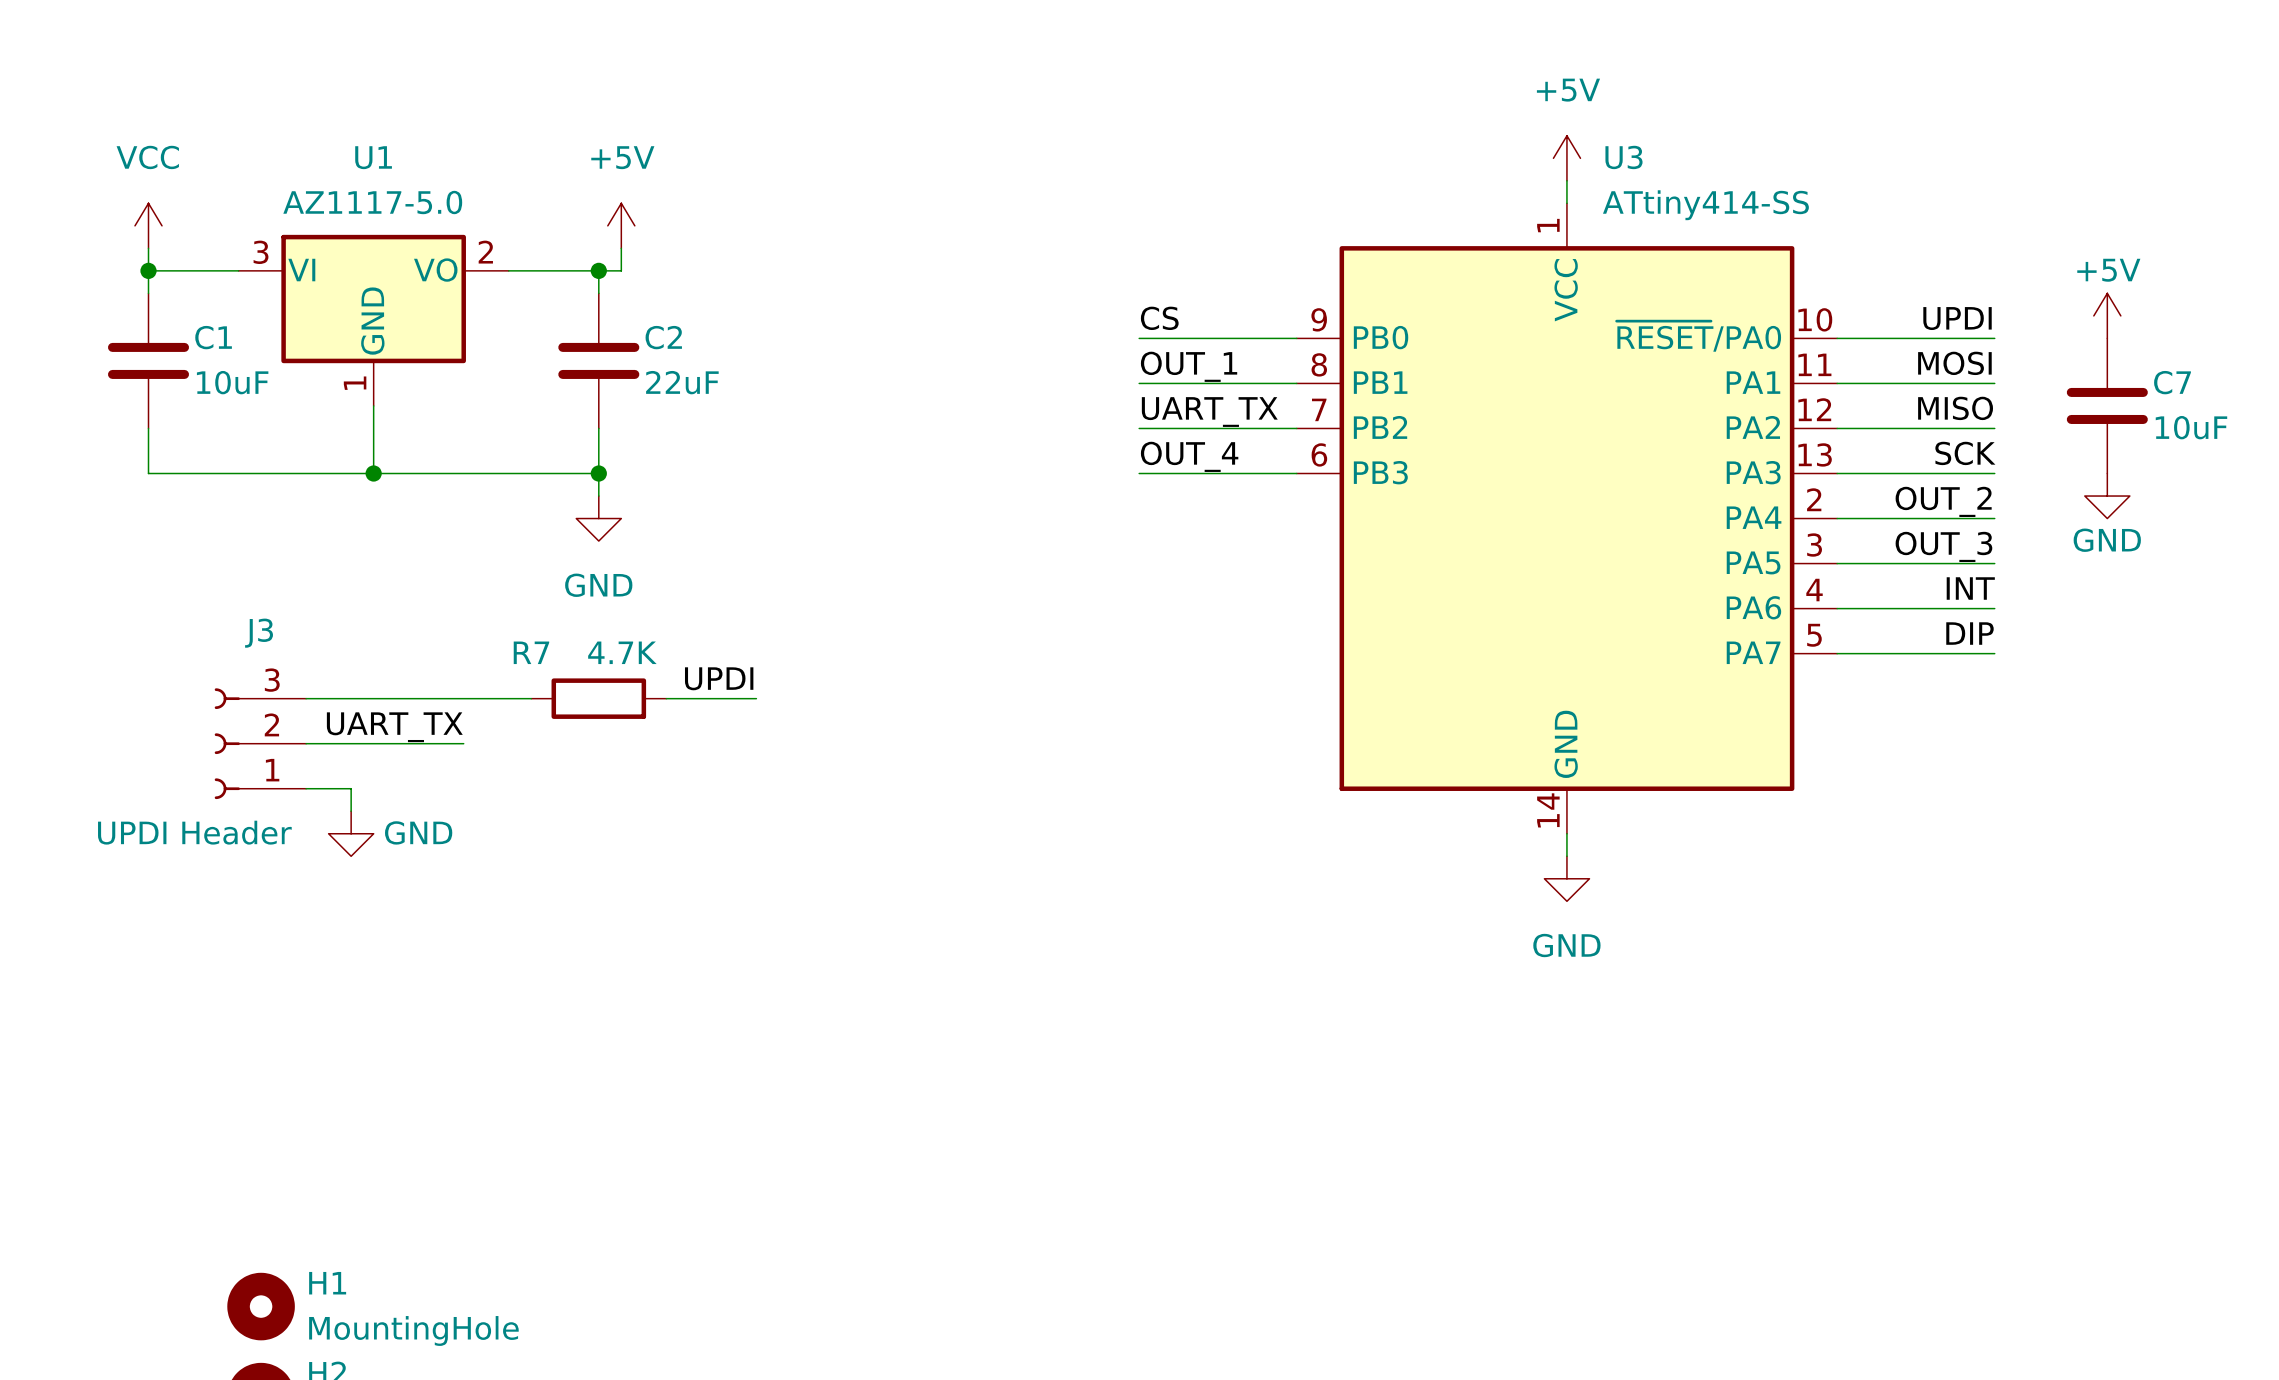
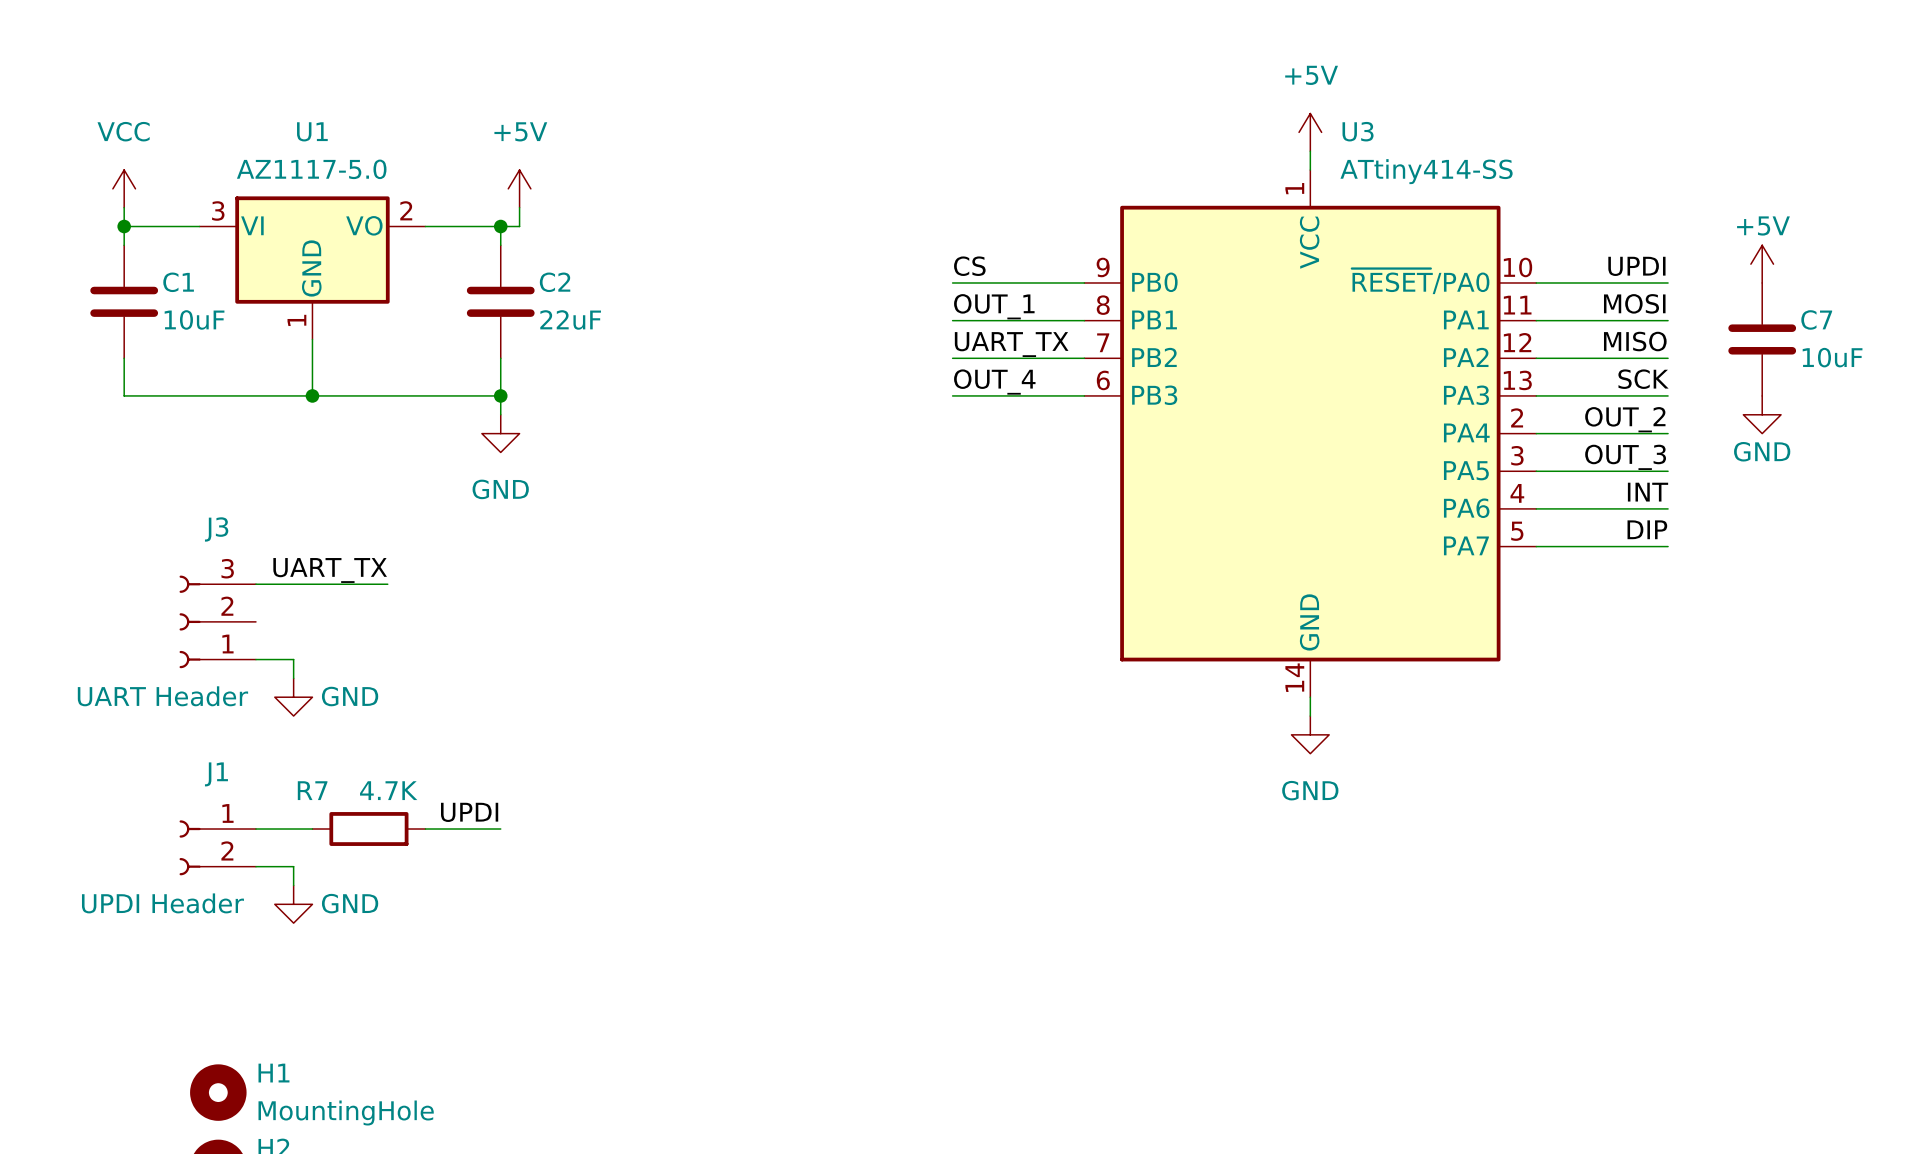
label position: UPDI (719, 678) -> UPDI (469, 812)
wire: (463, 698) (531, 698) -> (255, 829) (312, 829)
R7 position: (598, 698) -> (368, 829)
wire: (666, 698) (756, 698) -> (425, 829) (500, 829)
label position: UART_TX (394, 727) -> UART_TX (330, 570)
wire: (306, 743) (463, 743) -> none
J3 value: UPDI Header (194, 832) -> UART Header (162, 696)
J1: none -> UPDI Header (217, 847)
wire: none -> (255, 866) (293, 866) (293, 885)
power symbol: none -> GND (293, 904)

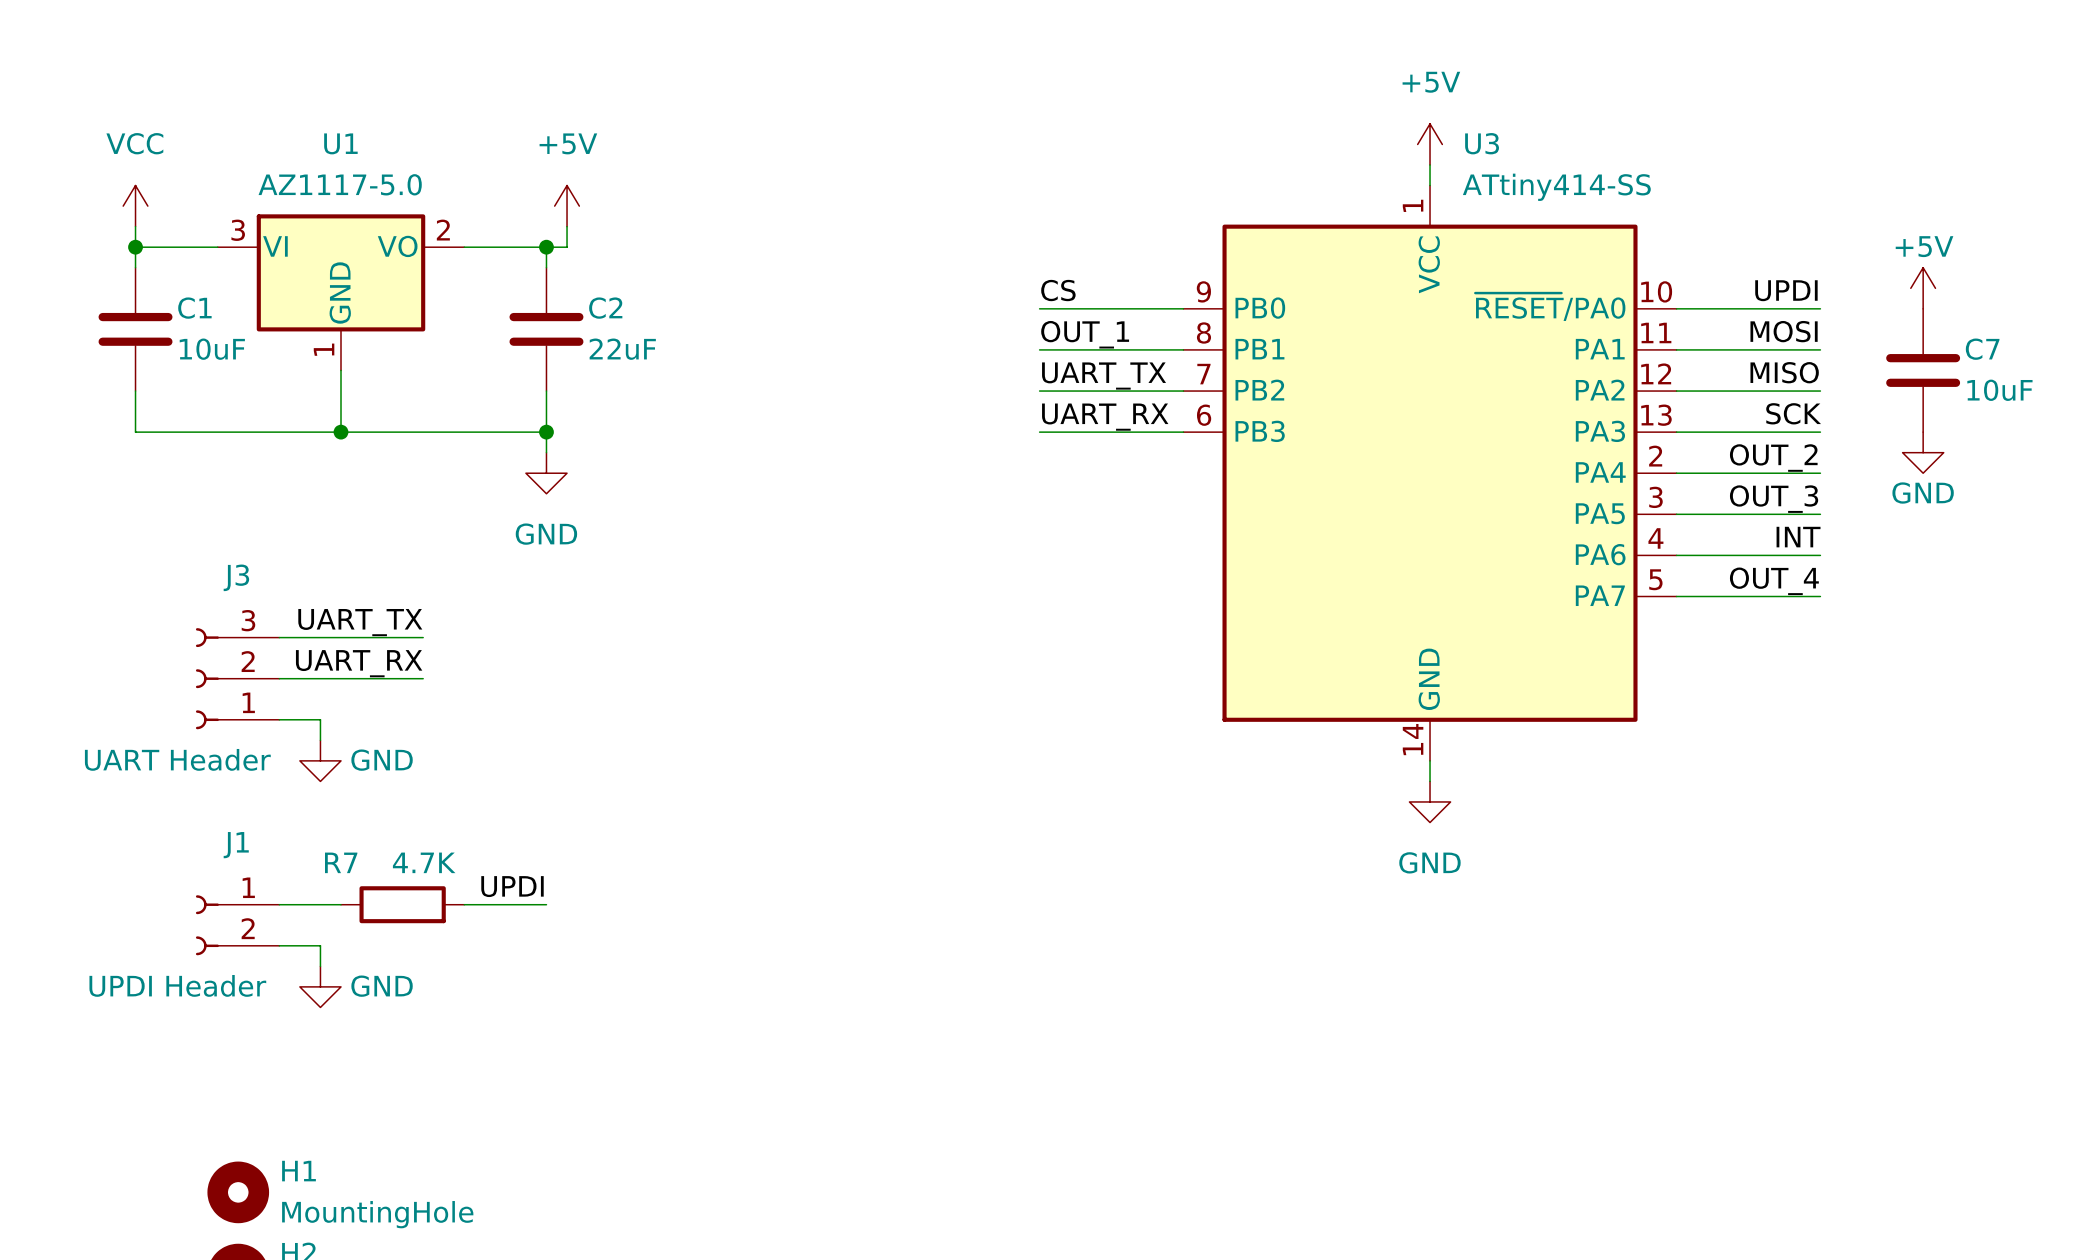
label: OUT_4 (994, 382) -> UART_RX (1105, 417)
label: DIP (1647, 529) -> OUT_4 (1774, 581)
label: none -> UART_RX (359, 663)
wire: none -> (279, 678) (423, 678)

